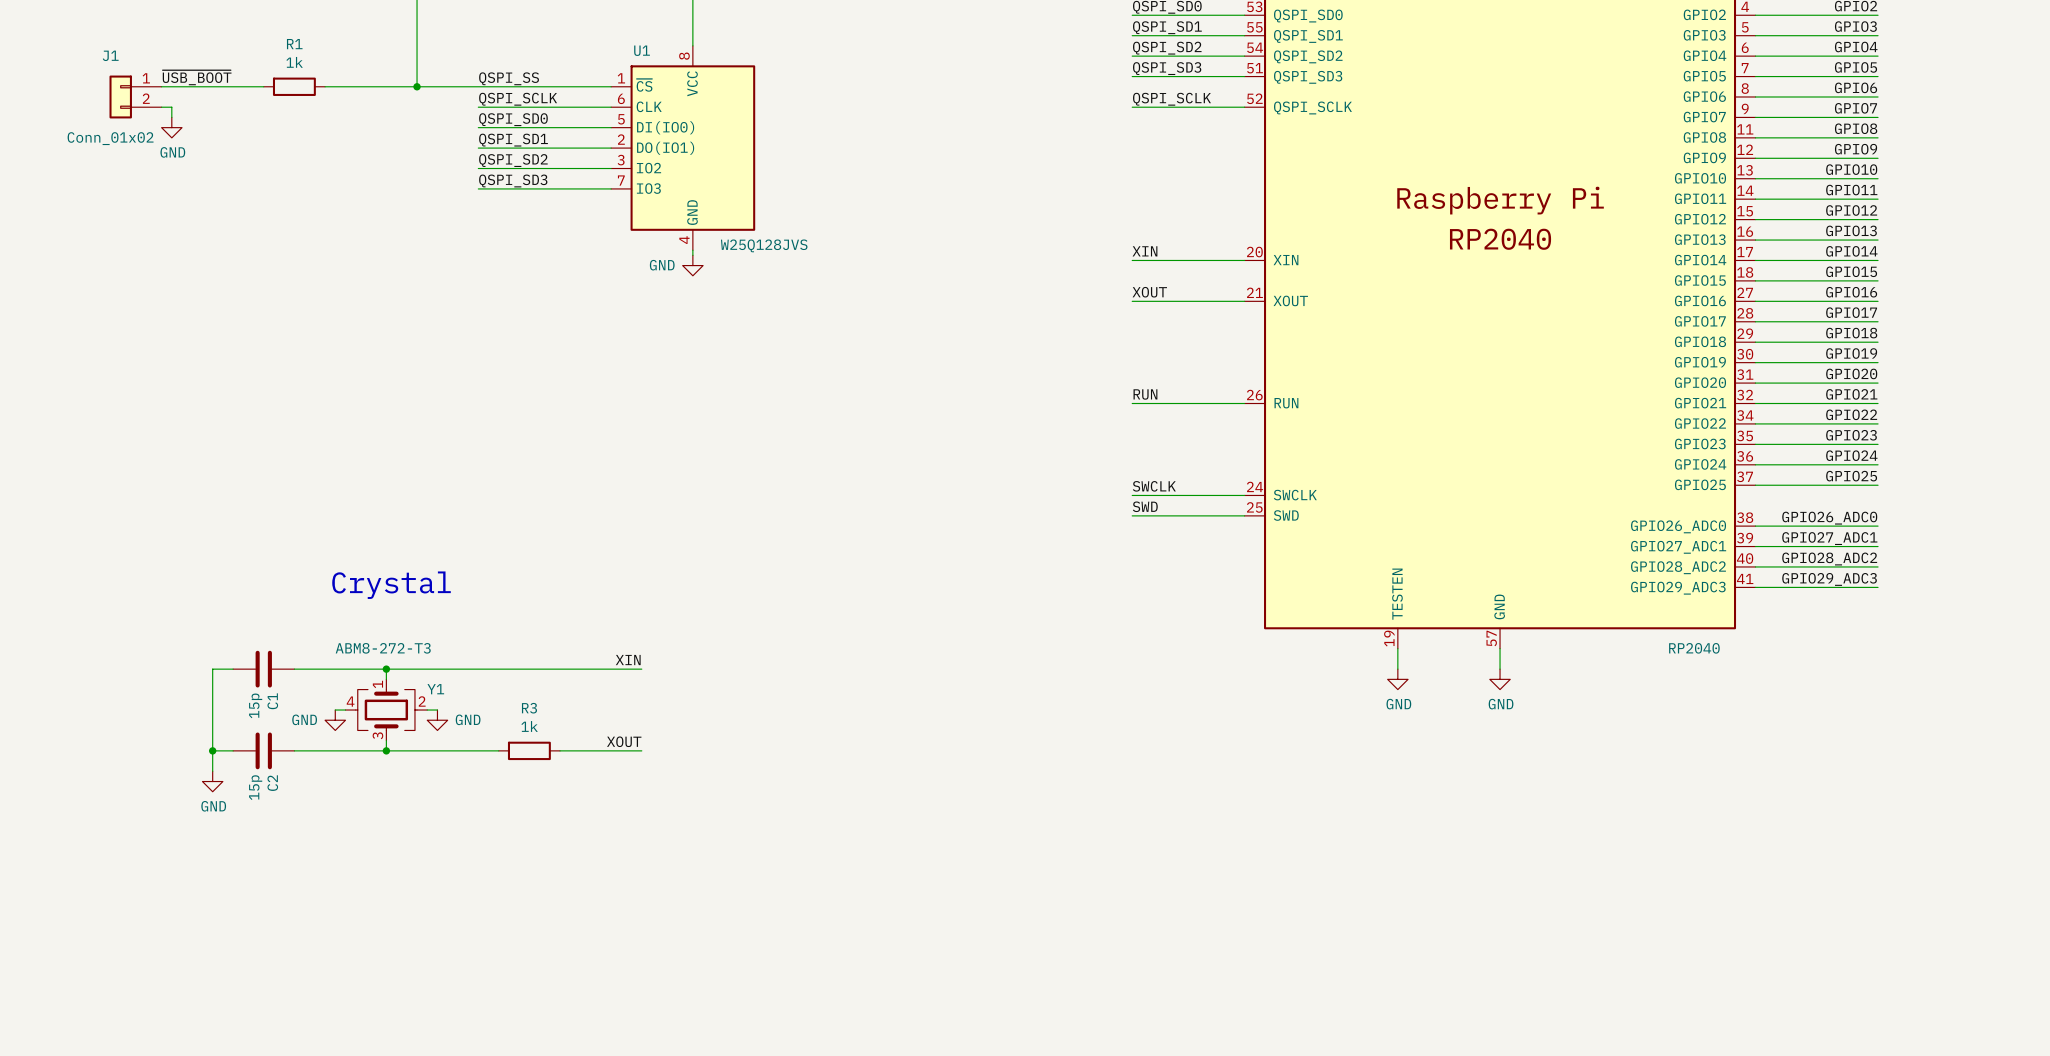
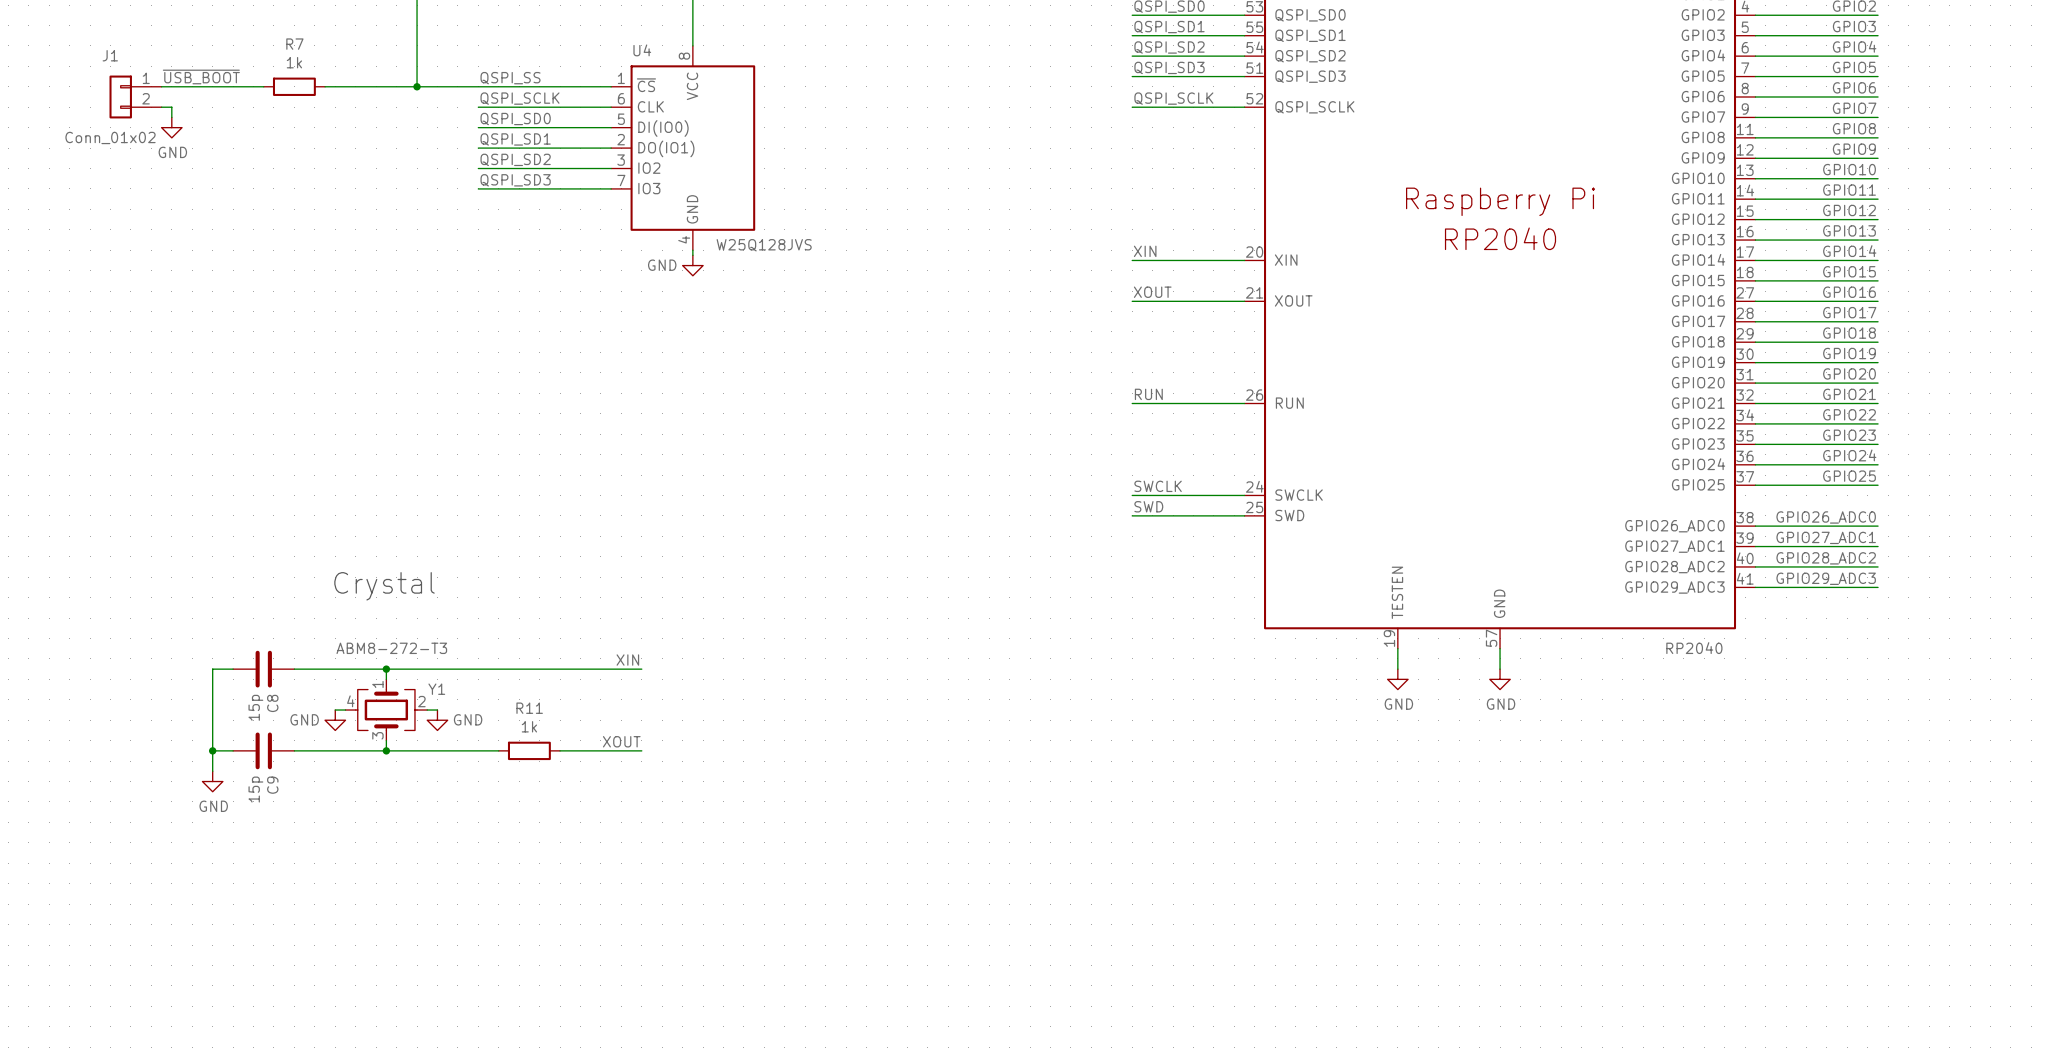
R1 name: R1 (294, 44) -> R7 (294, 44)
U1 name: U1 (642, 50) -> U4 (642, 50)
C1 name: C1 (272, 701) -> C8 (272, 703)
R3 name: R3 (529, 708) -> R11 (529, 708)
C2 name: C2 (272, 783) -> C9 (272, 785)

